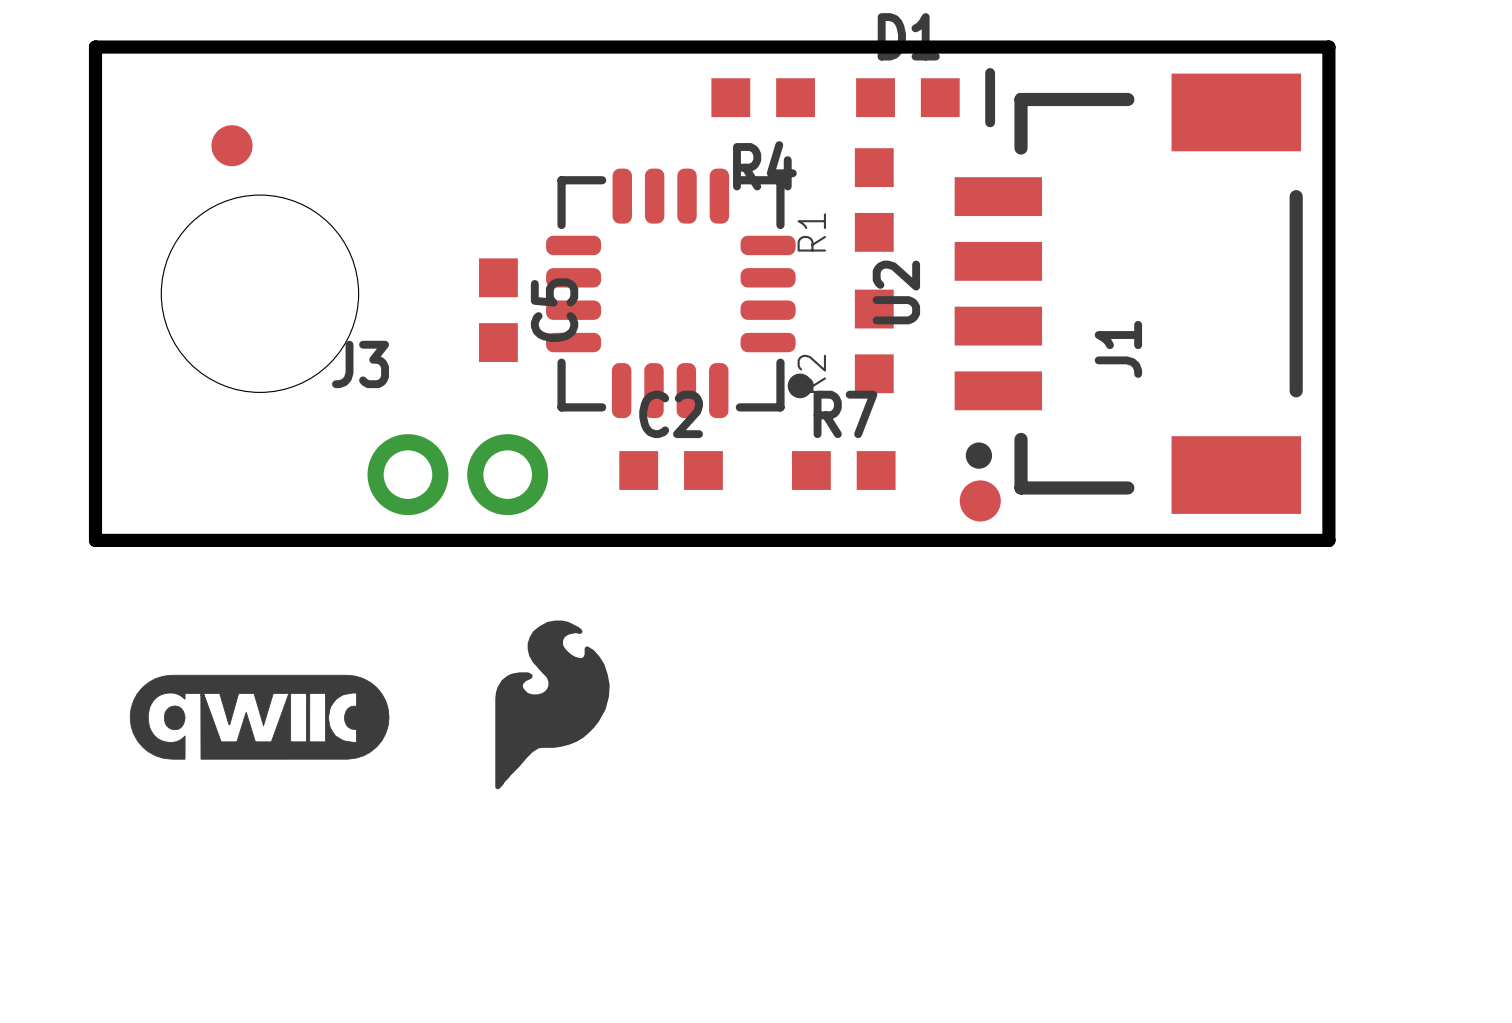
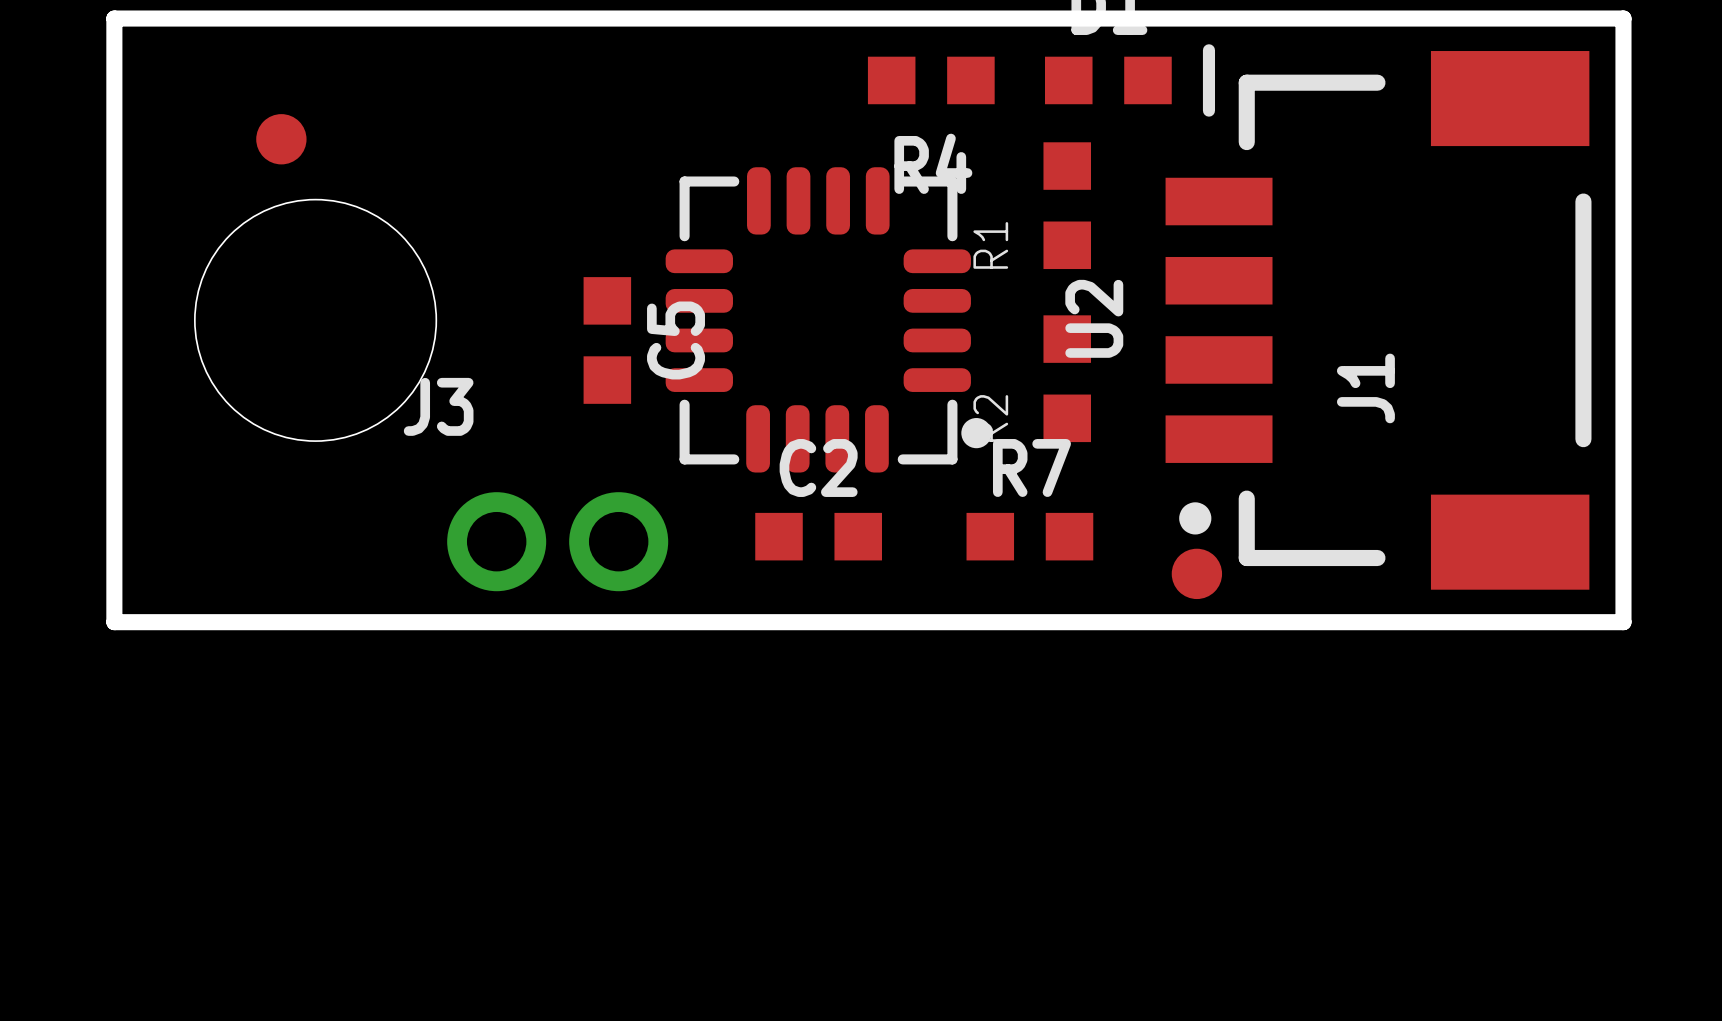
drawing: [495, 620, 610, 790] -> none
drawing: [129, 674, 390, 760] -> none

